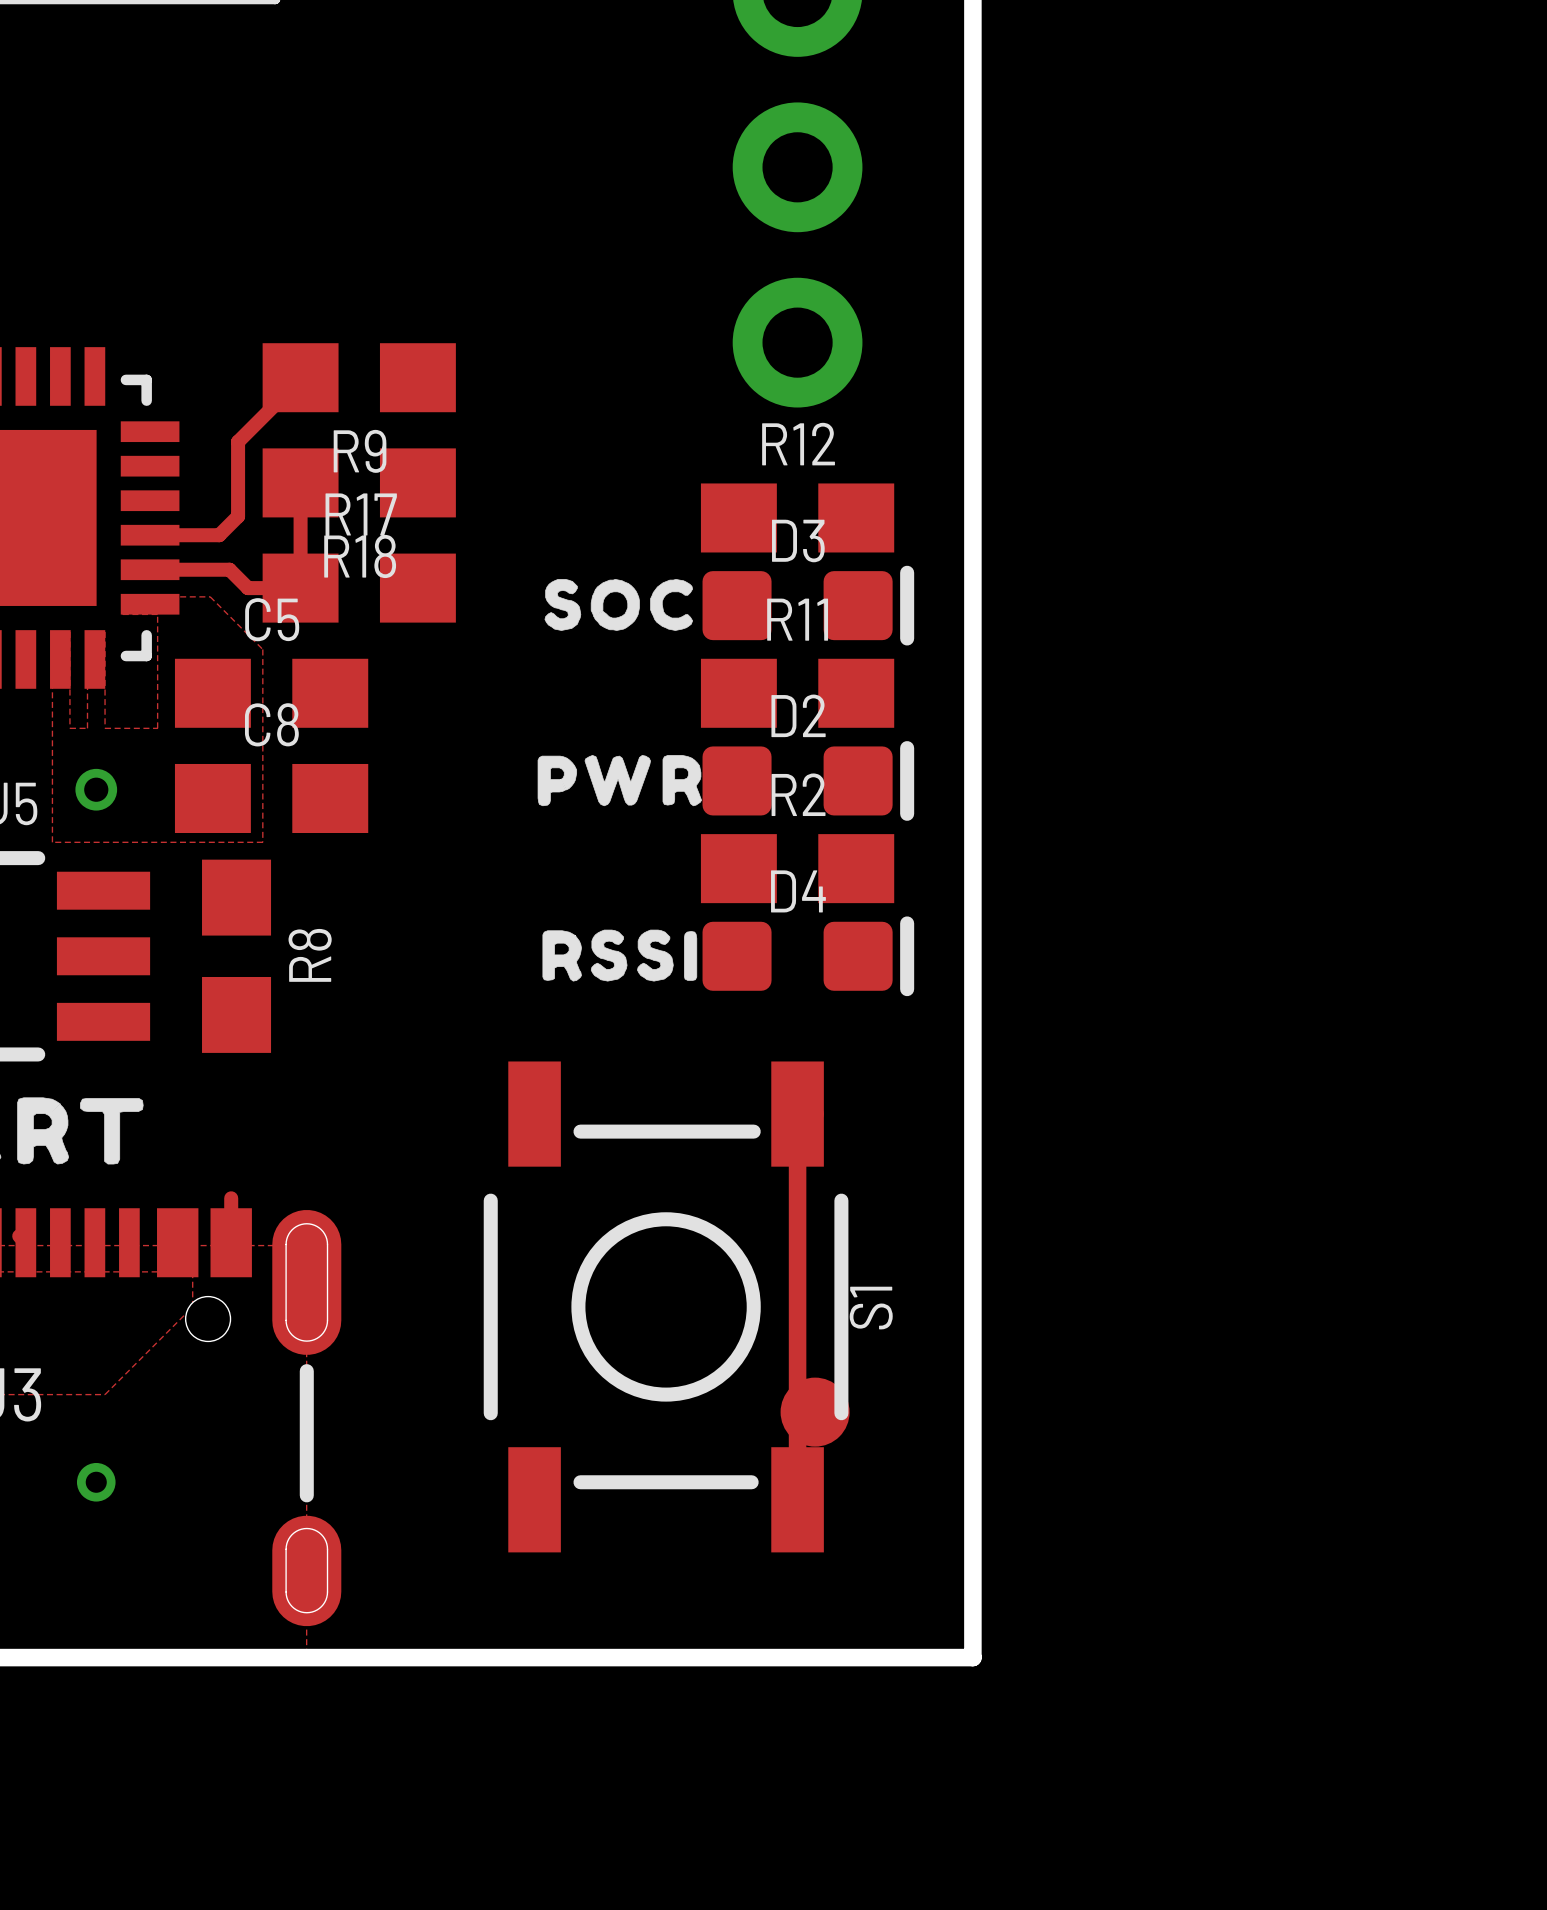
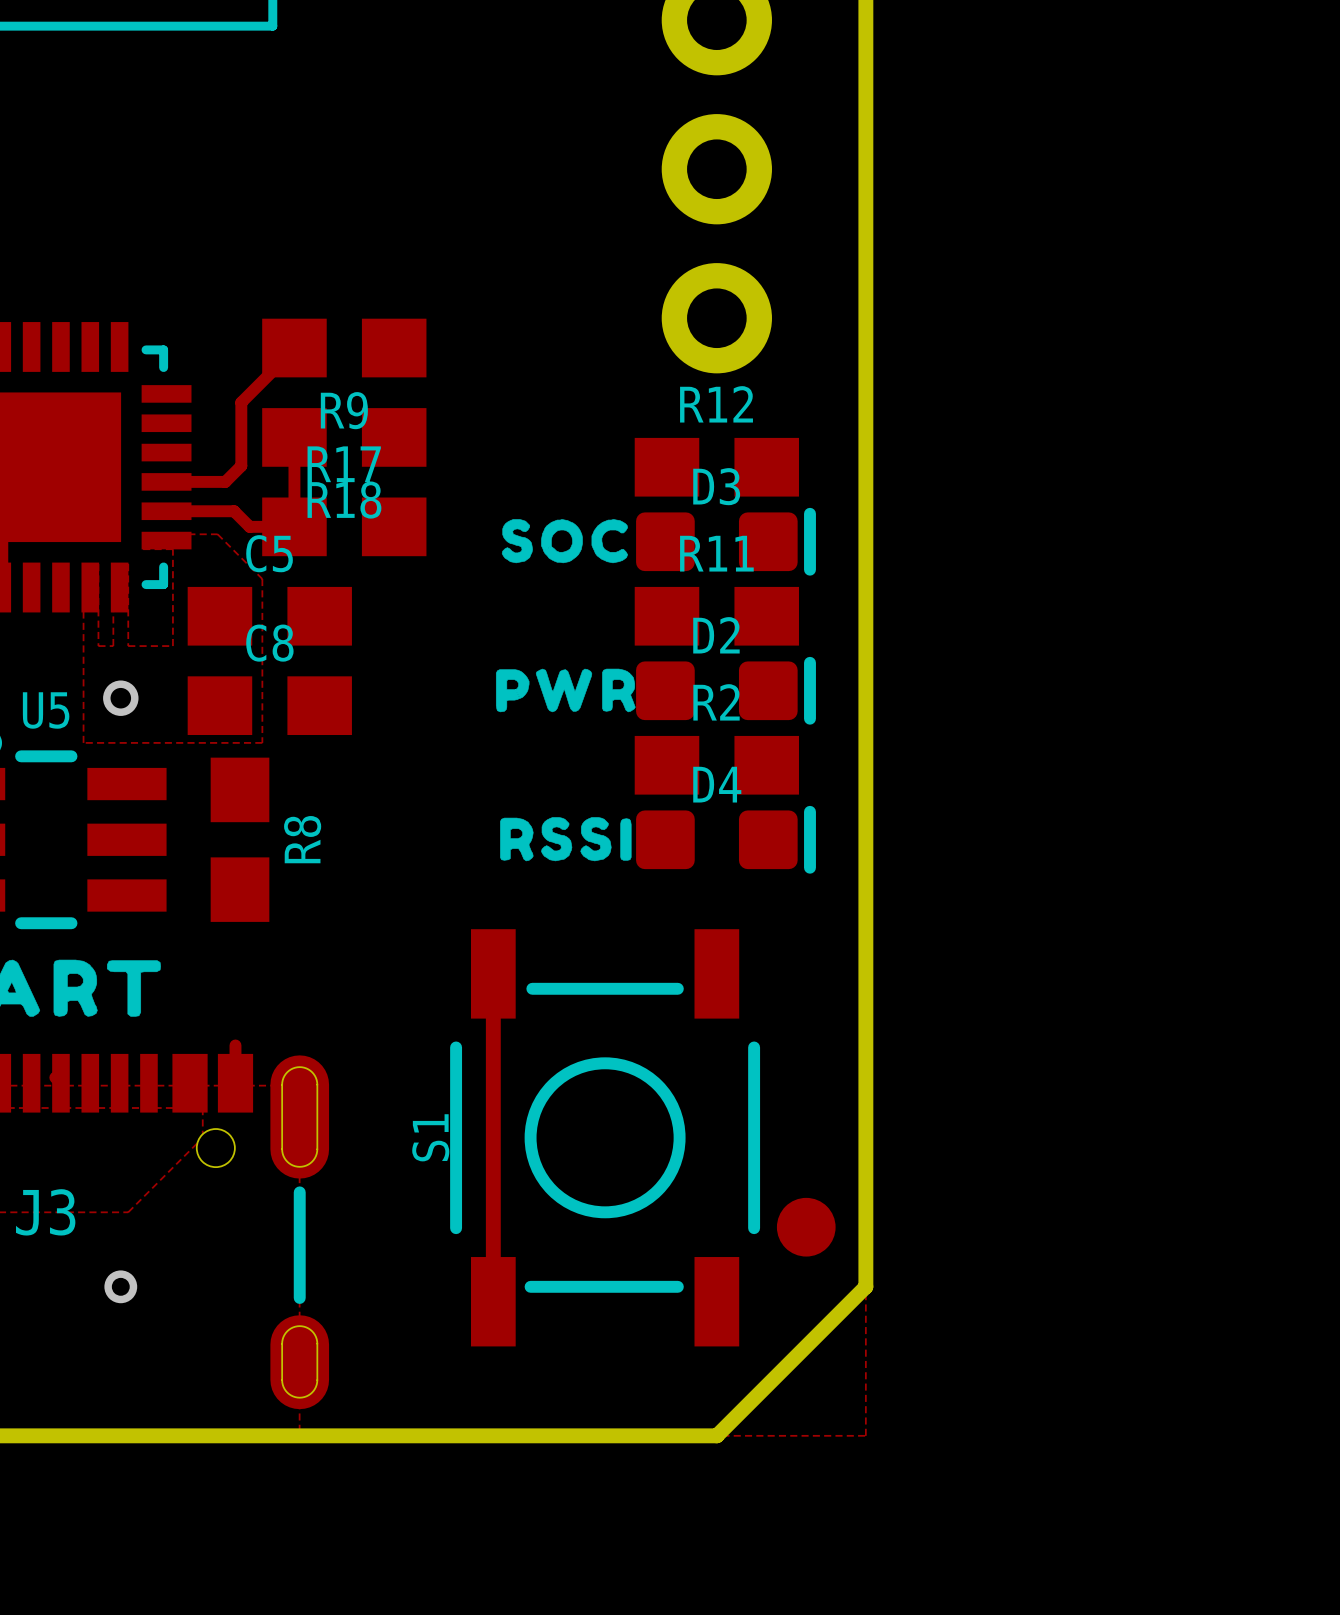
track: none -> (493, 973) (493, 1301)
track: (815, 1114) (797, 1114) (797, 1499) -> none
S1 rotation: 0° (666, 1306) -> 180° (605, 1137)
part position: (815, 1412) -> (806, 1227)
board edge: (972, 1482) (972, 1657) (797, 1657) -> (865, 1286) (716, 1435)

